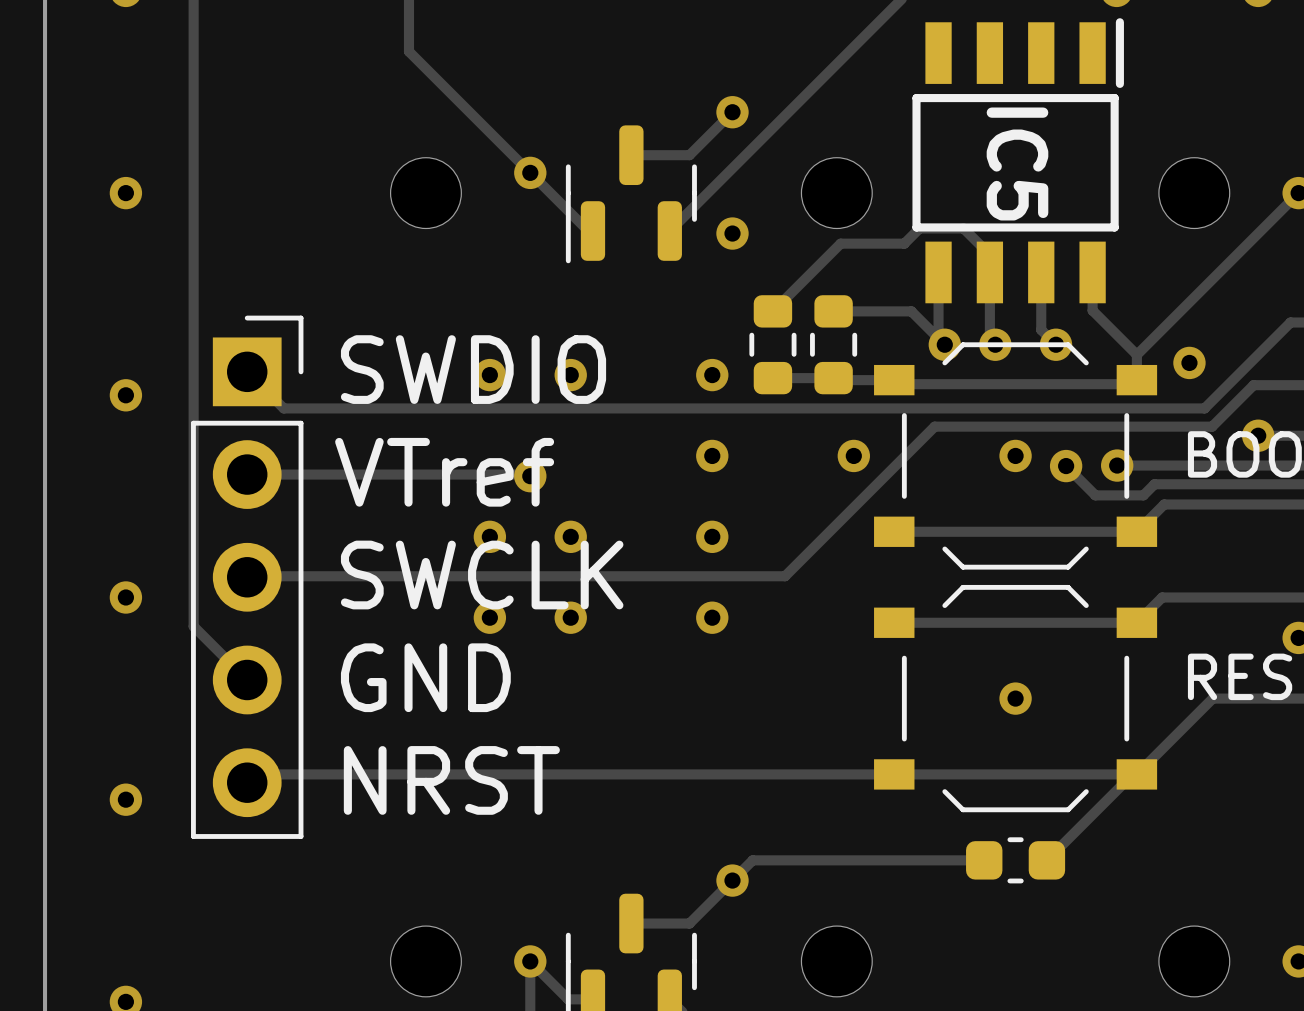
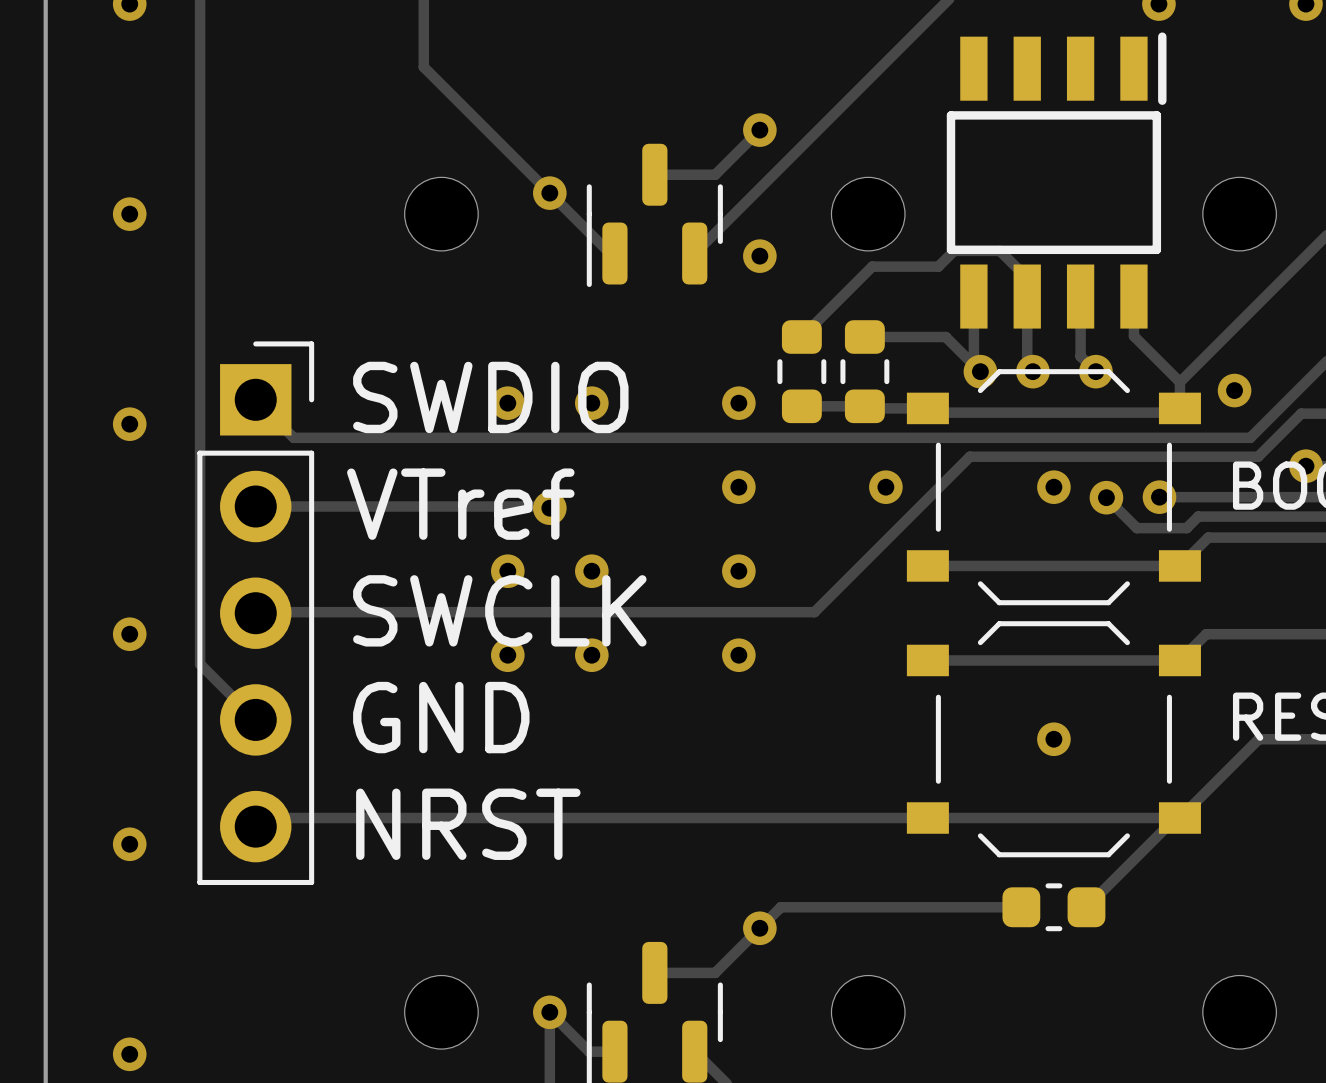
IC5 name: IC5 (1017, 163) -> none

